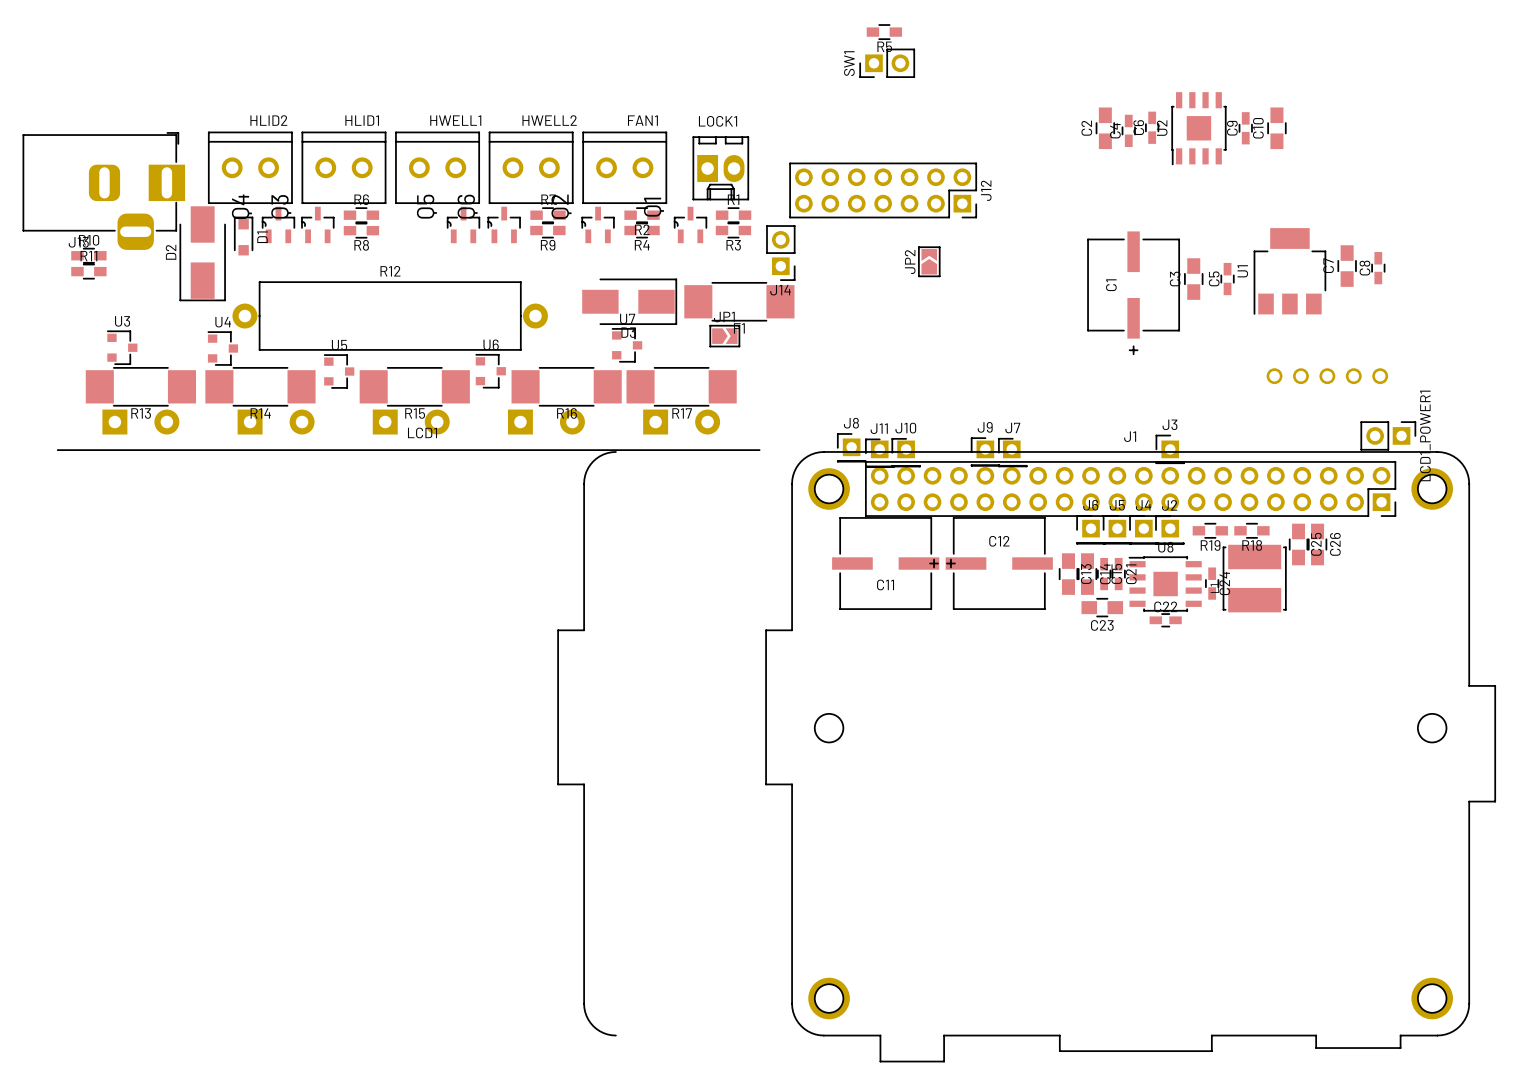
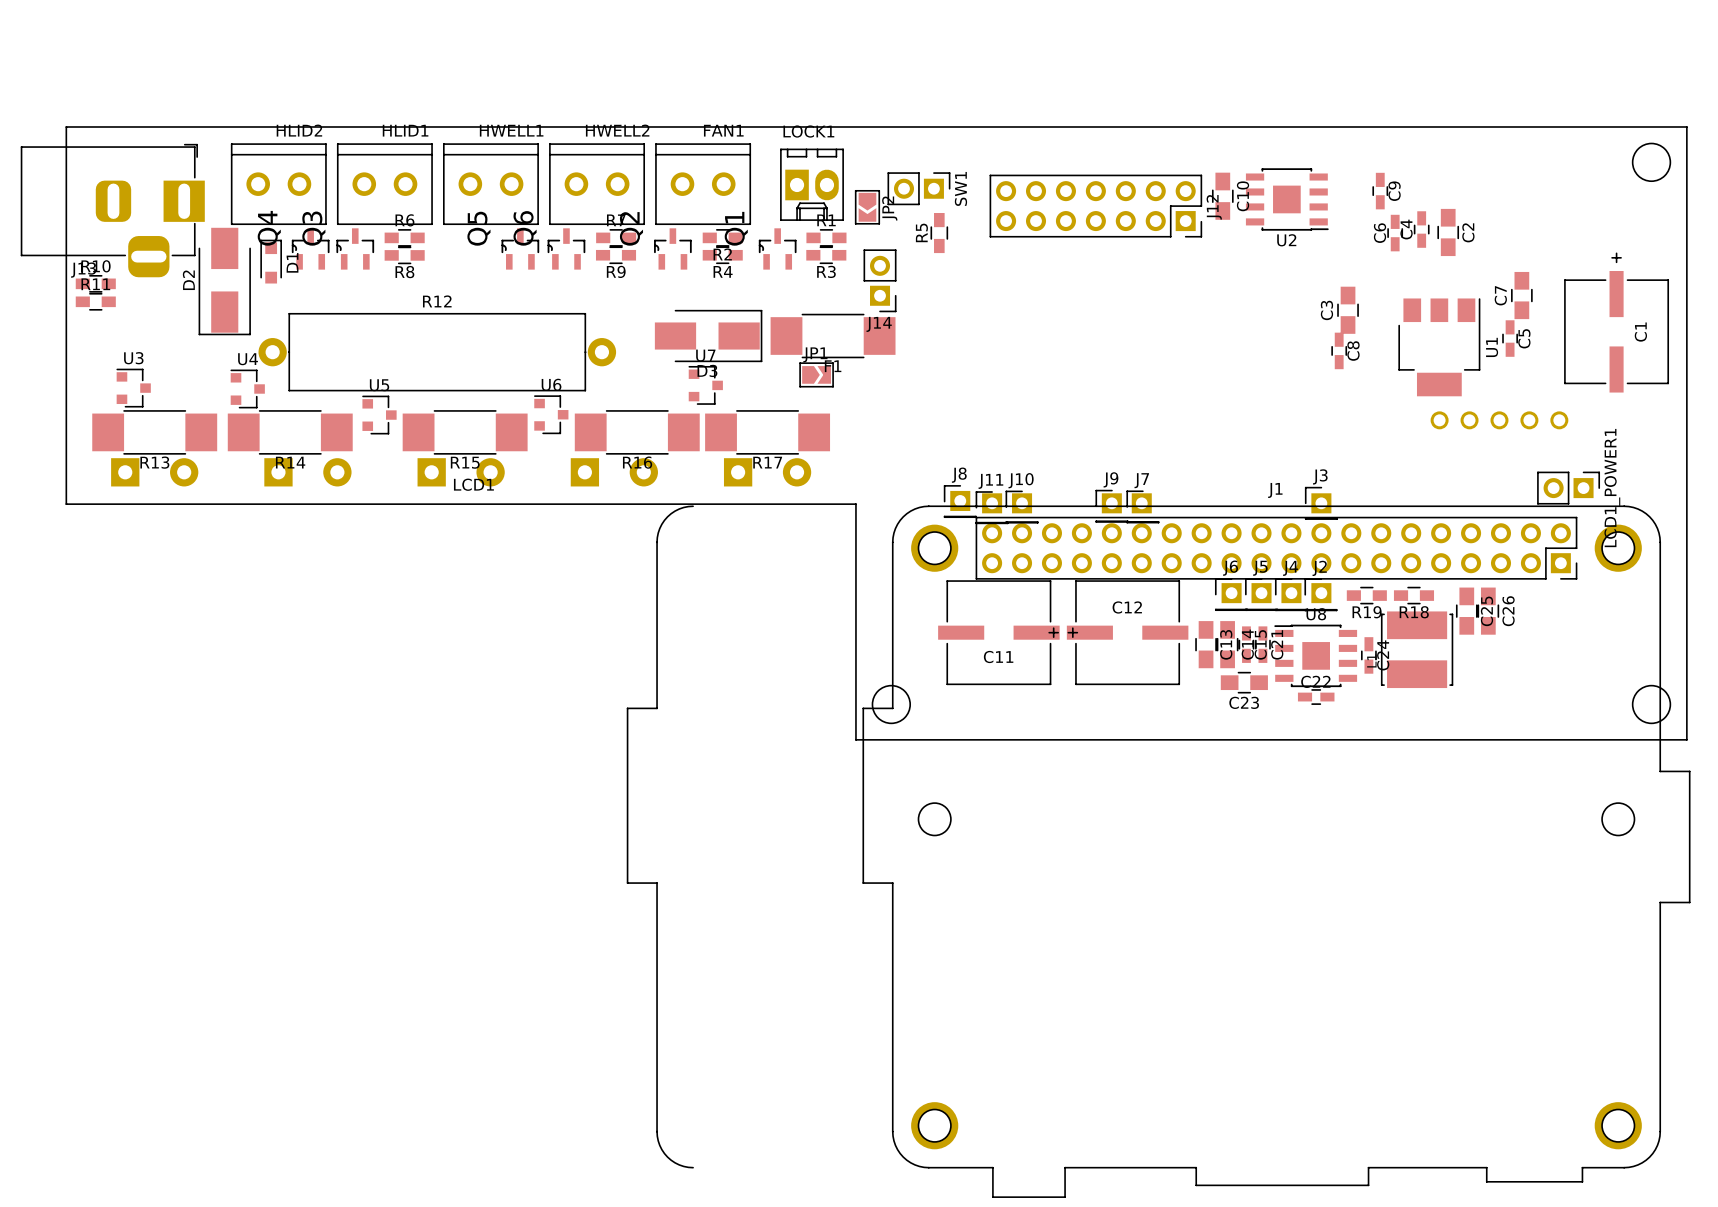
R5 rotation: 0° (884, 32) -> 90° clockwise (939, 233)
R5 position: (884, 32) -> (939, 233)
SW1 rotation: 0° (887, 63) -> 180° (918, 188)
SW1 position: (887, 63) -> (918, 188)
C6 position: (1152, 127) -> (1395, 233)
C2 name position: C2 (1086, 128) -> C2 (1468, 232)
C2 position: (1105, 128) -> (1448, 232)
U2 rotation: 0° (1198, 128) -> 90° counterclockwise (1287, 199)
U2 position: (1198, 128) -> (1287, 199)
C9 name position: C9 (1232, 128) -> C9 (1394, 191)
C9 position: (1245, 128) -> (1380, 191)
C10 name position: C10 (1258, 128) -> C10 (1243, 196)
C10 position: (1276, 128) -> (1222, 196)
C4 position: (1128, 130) -> (1421, 229)
round board edge: none -> [1632, 142, 1671, 182]
J12 position: (883, 190) -> (1095, 206)
JP2 rotation: 0° (929, 261) -> 180° (867, 207)
JP2 position: (929, 261) -> (867, 207)
C8 name position: C8 (1364, 268) -> C8 (1353, 351)
C8 position: (1378, 268) -> (1339, 350)
U1 rotation: 0° (1289, 271) -> 180° (1439, 347)
C5 name position: C5 (1214, 278) -> C5 (1524, 338)
C5 position: (1227, 279) -> (1510, 338)
C1 rotation: 0° (1133, 293) -> 180° (1616, 322)
C1 position: (1133, 293) -> (1616, 322)
board edge: (57, 450) (62, 450) -> (855, 504) (855, 739) (1686, 739) (1686, 126) (66, 126) (66, 504)
round board edge: none -> [871, 685, 911, 724]
round board edge: none -> [1632, 685, 1671, 724]

